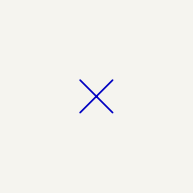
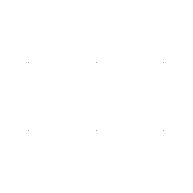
no-connect mark: (96, 96) -> none

